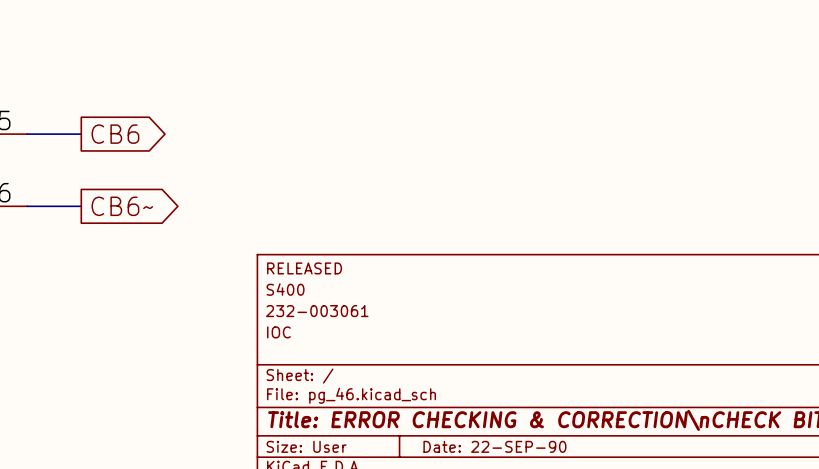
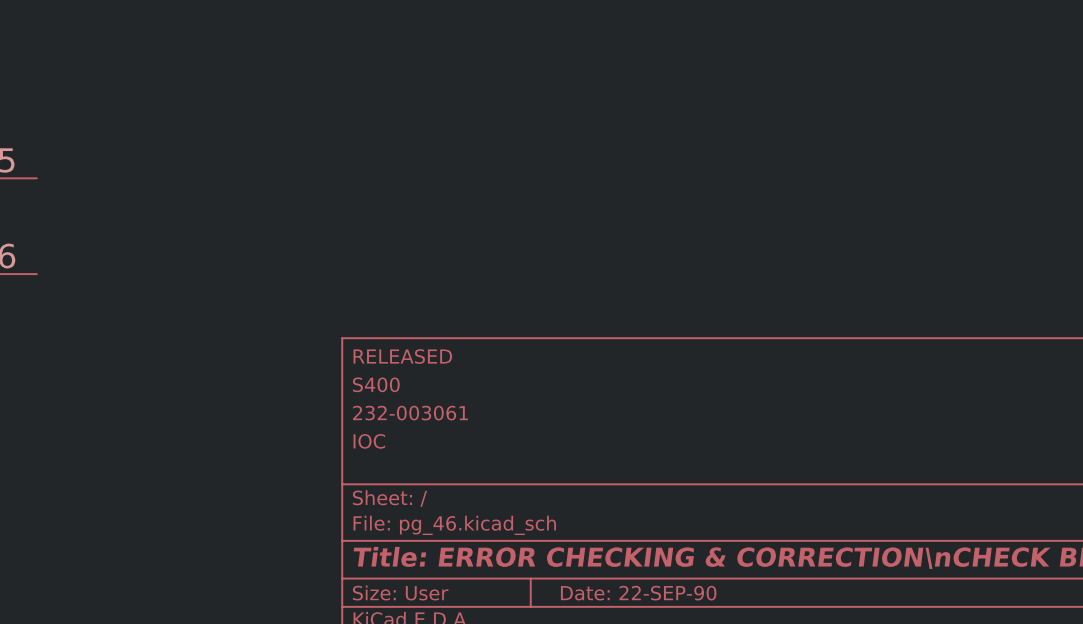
wire: (27, 134) (81, 134) -> none
global label: CB6 (115, 134) -> none
wire: (27, 206) (81, 206) -> none
global label: CB6~ (122, 206) -> none

